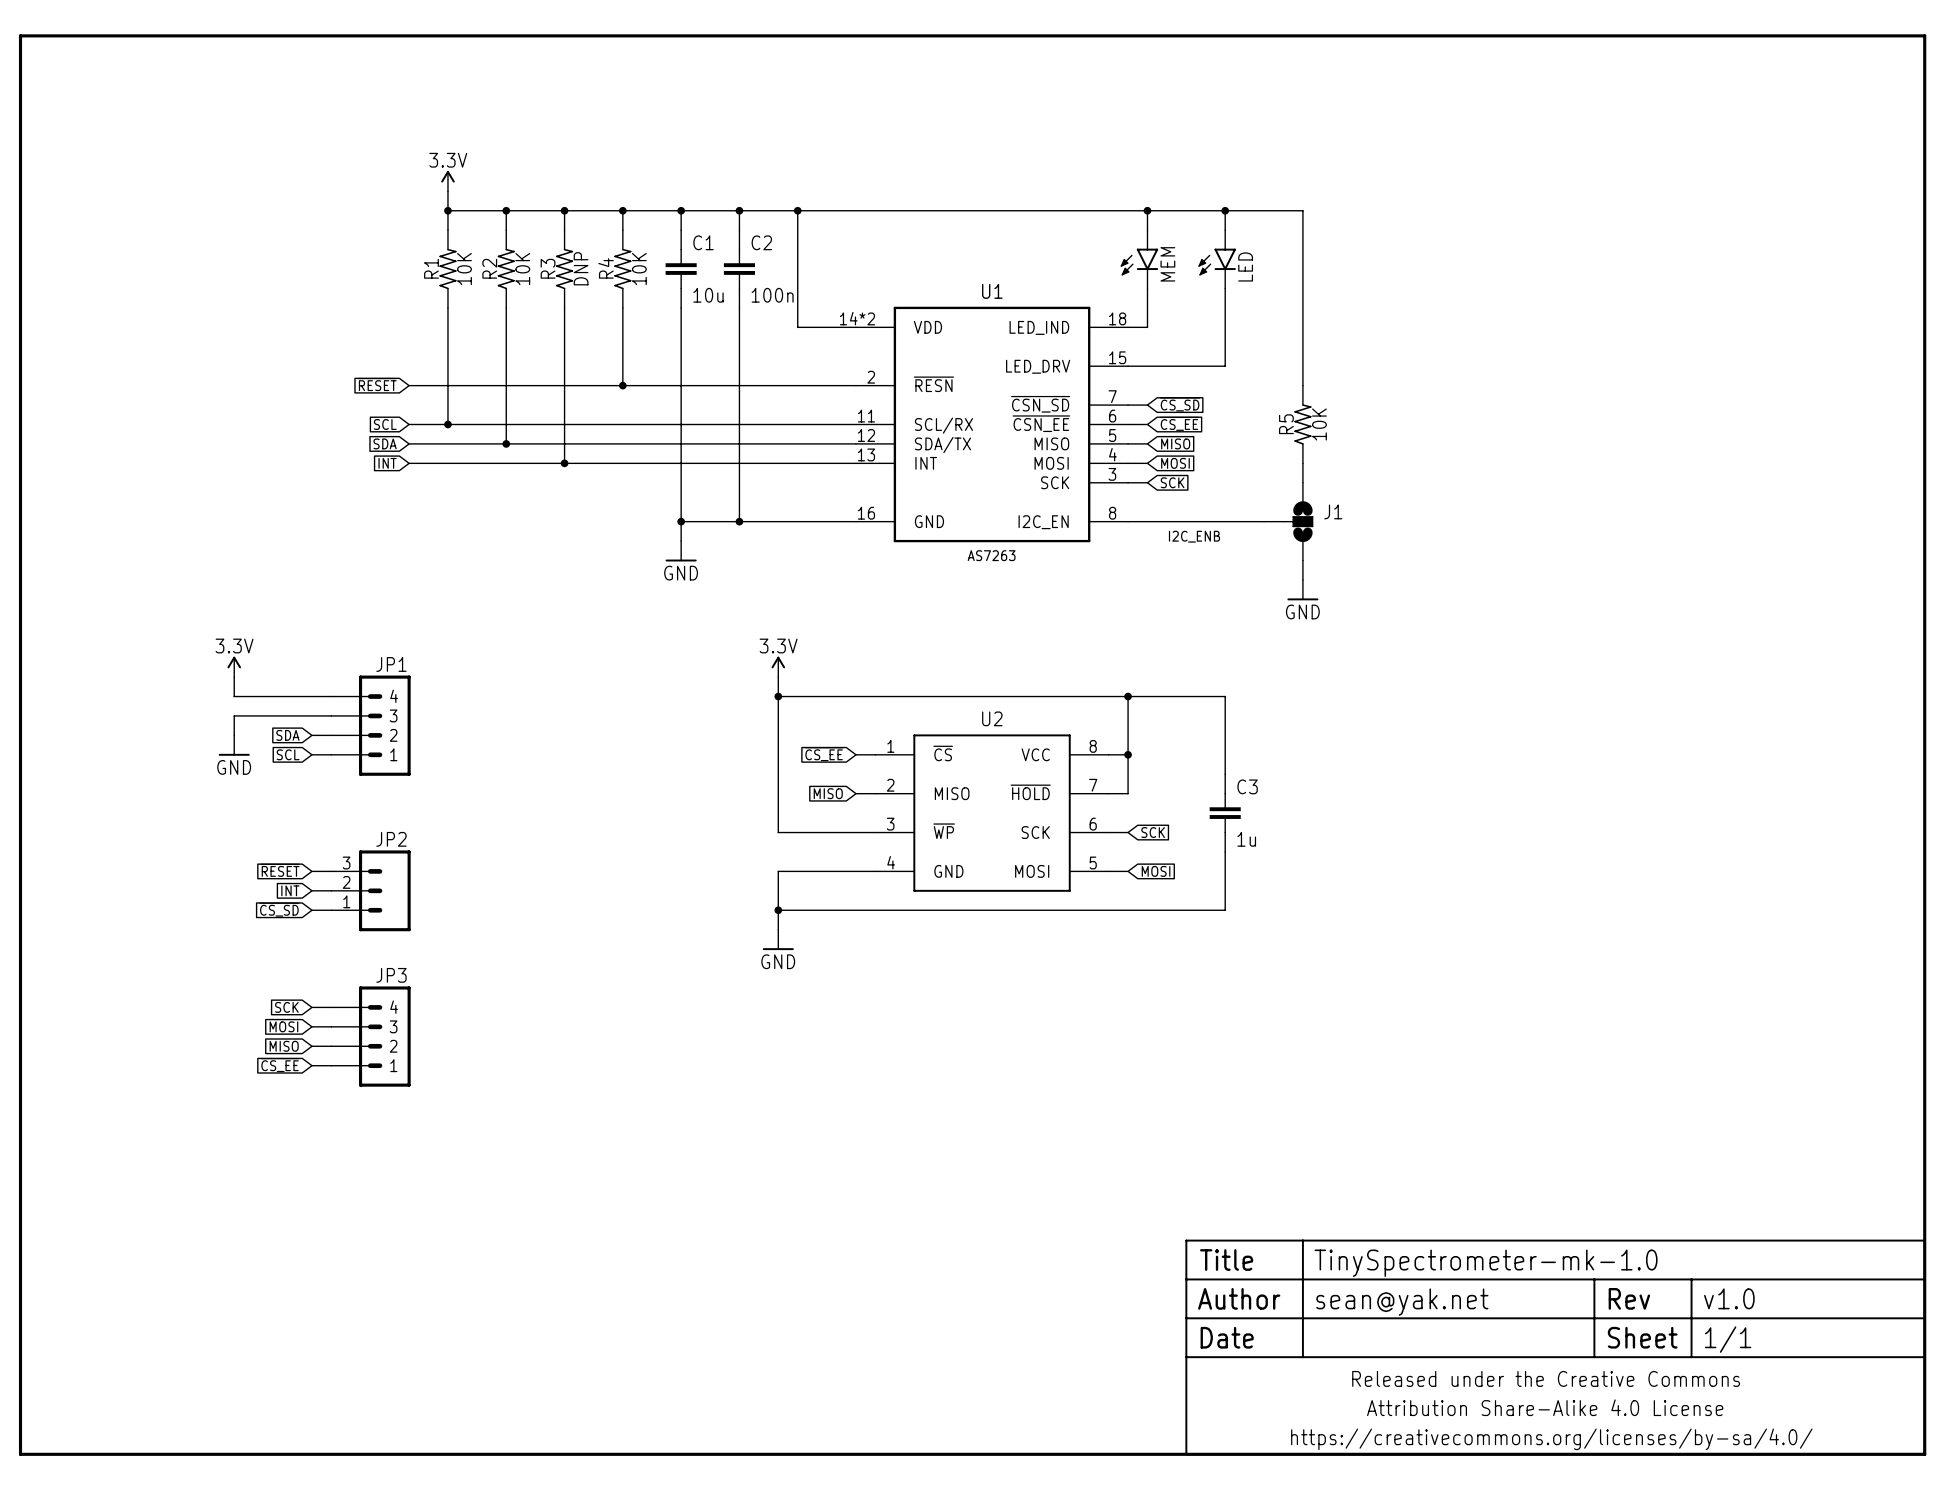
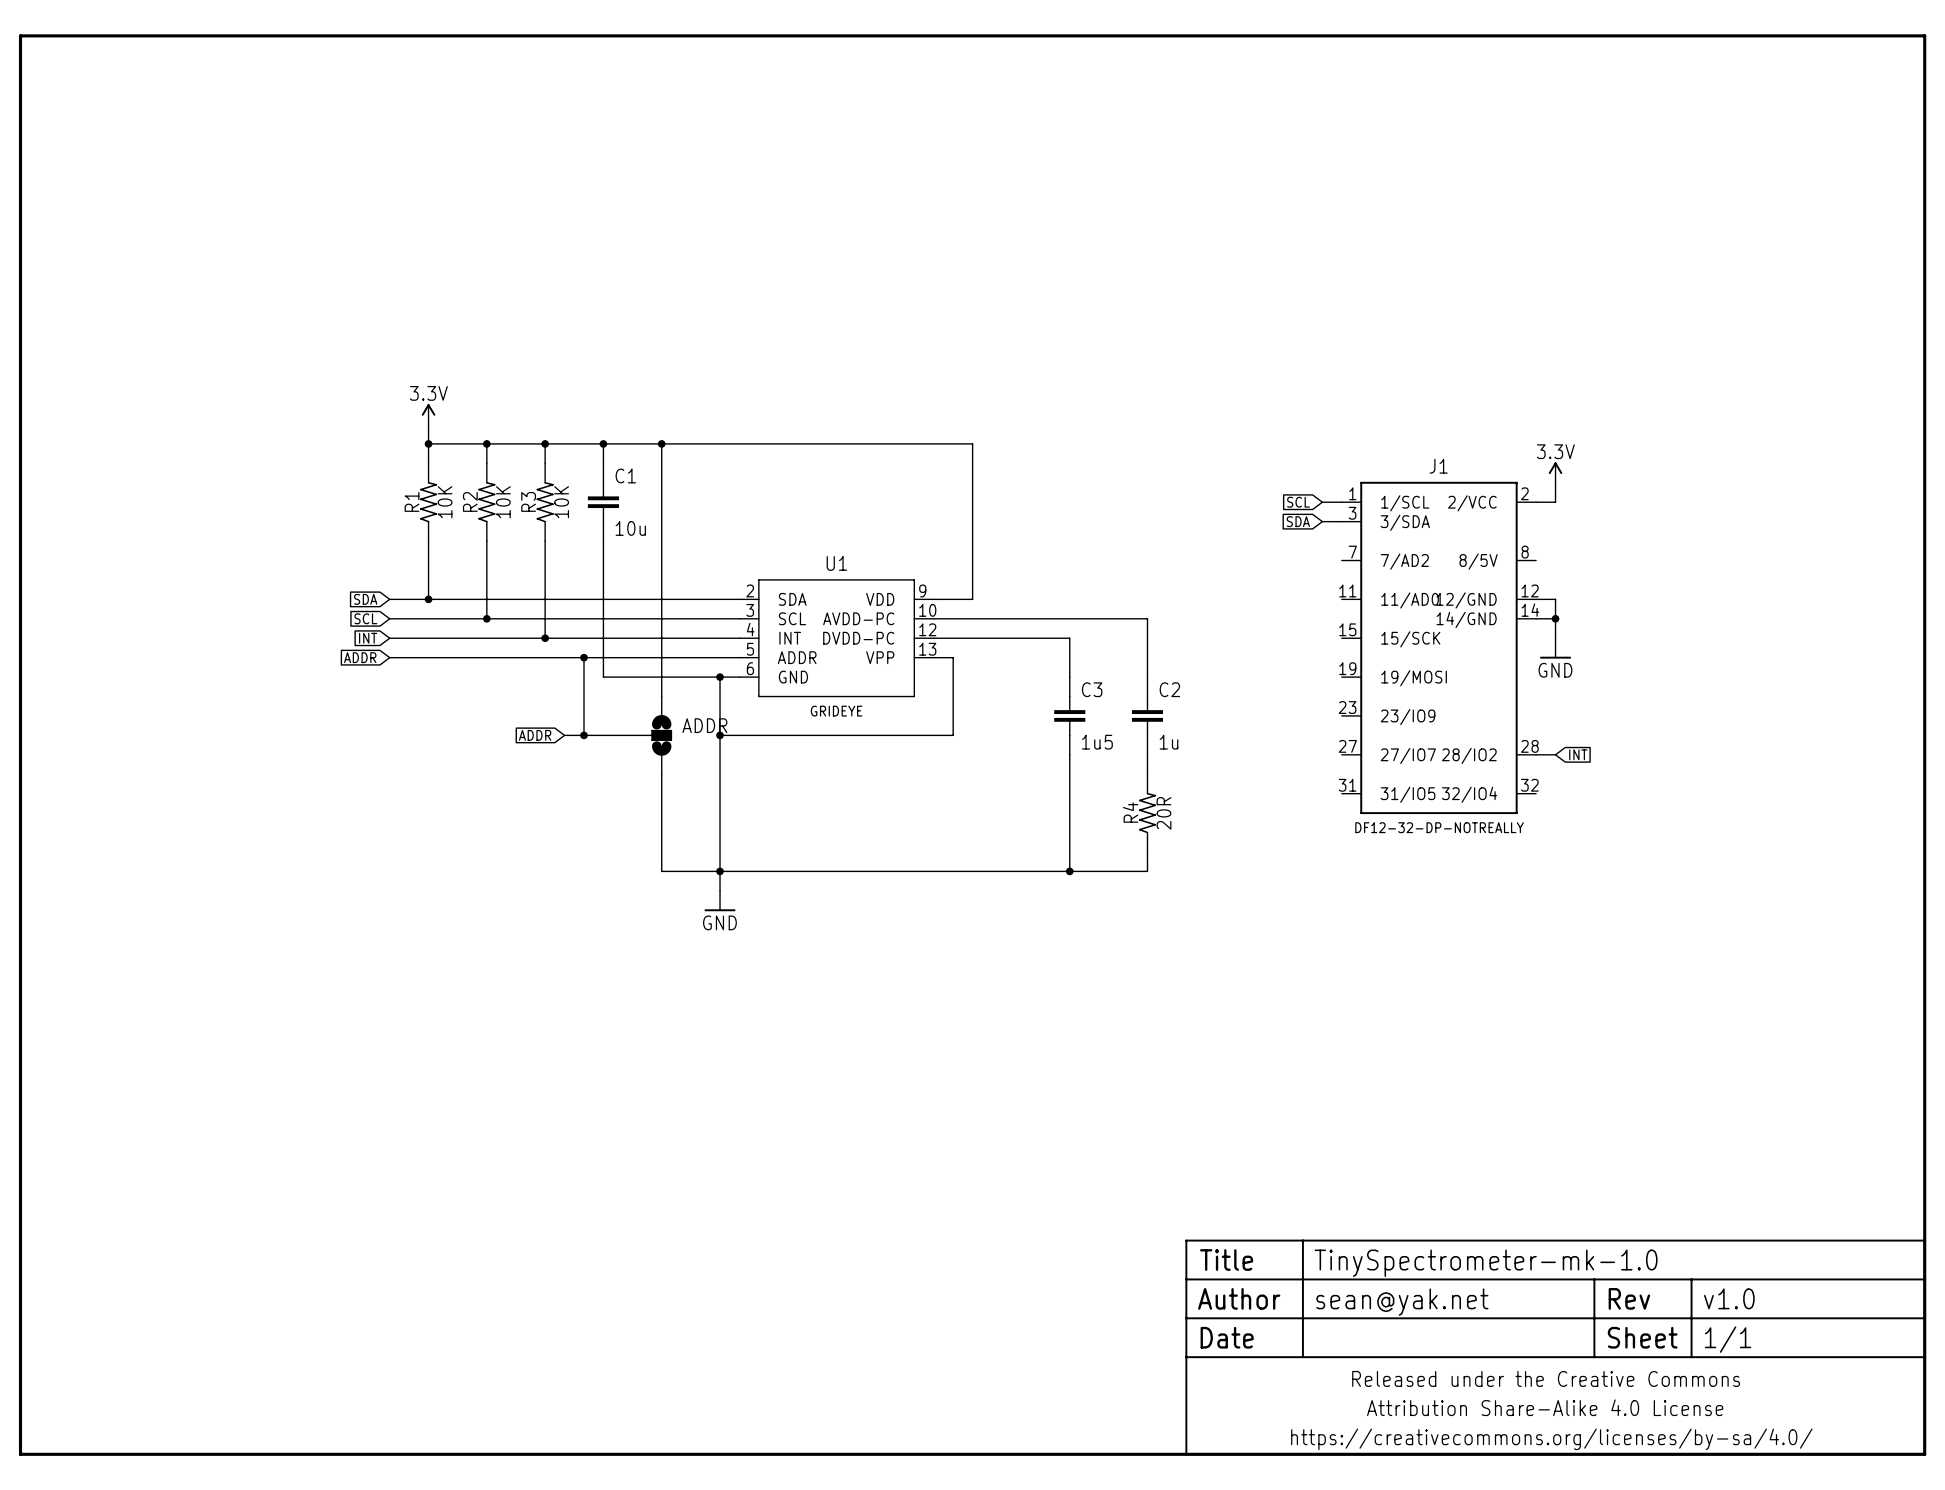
power symbol: 3.3V (447, 181) -> none
wire: (447, 191) (447, 230) -> none
wire: (447, 210) (1302, 210) (1302, 385) -> none
junction: (447, 210) -> none
wire: (506, 210) (506, 230) -> none
junction: (506, 210) -> none
wire: (564, 210) (564, 230) -> none
junction: (564, 210) -> none
wire: (622, 210) (622, 230) -> none
junction: (622, 210) -> none
wire: (681, 210) (681, 230) -> none
junction: (681, 210) -> none
wire: (739, 210) (739, 230) -> none
junction: (739, 210) -> none
wire: (797, 210) (797, 327) (856, 327) -> none
junction: (797, 210) -> none
wire: (1147, 210) (1147, 230) -> none
junction: (1147, 210) -> none
wire: (1225, 210) (1225, 230) -> none
junction: (1225, 210) -> none
MEM: (1139, 259) -> none
LED: (1217, 259) -> none
R3 value: DNP (581, 268) -> 10K (561, 502)
R1 position: (447, 269) -> (428, 502)
R2 position: (506, 269) -> (486, 502)
R3 position: (564, 269) -> (545, 502)
R4 position: (622, 269) -> (1147, 813)
R4 value: 10K (639, 269) -> 20R (1164, 813)
C1 position: (681, 269) -> (603, 502)
C2 position: (739, 269) -> (1147, 715)
wire: (1147, 288) (1147, 327) (1128, 327) -> none
wire: (1225, 288) (1225, 366) (1128, 366) -> none
U1 name position: U1 (992, 291) -> U1 (836, 563)
C2 value: 100n (772, 295) -> 1u (1168, 742)
U1 symbol: [856, 306, 1129, 543] -> [739, 579, 934, 698]
wire: (447, 307) (447, 424) -> none
wire: (506, 307) (506, 443) -> none
wire: (564, 307) (564, 463) -> none
wire: (622, 307) (622, 385) -> none
wire: (681, 307) (681, 541) -> none
wire: (739, 307) (739, 521) -> none
global label: ~{RESET} (377, 384) -> none
wire: (409, 385) (856, 385) -> none
junction: (622, 385) -> none
global label: ~{CS_SD} (1180, 404) -> none
wire: (1128, 405) (1147, 405) -> none
power symbol: none -> 3.3V (428, 414)
global label: ~{CS_EE} (1179, 423) -> none
global label: SCL (385, 424) -> none
wire: (409, 424) (856, 424) -> none
wire: none -> (428, 424) (428, 463)
junction: (447, 424) -> none
wire: (1128, 424) (1147, 424) -> none
R5: 10K (1302, 424) -> none
global label: SDA (385, 443) -> none
wire: (409, 443) (428, 443) -> none
junction: none -> (428, 443)
wire: none -> (486, 443) (486, 463)
junction: none -> (486, 443)
junction: (506, 443) -> none
wire: none -> (545, 443) (545, 463)
junction: none -> (545, 443)
wire: none -> (603, 443) (603, 463)
junction: none -> (603, 443)
wire: none -> (661, 443) (661, 696)
junction: none -> (661, 443)
wire: none -> (856, 443) (972, 443) (972, 599) (933, 599)
wire: (1128, 443) (1147, 443) -> none
global label: MISO (1175, 443) -> none
global label: INT (387, 463) -> none
wire: (409, 463) (856, 463) -> none
junction: (564, 463) -> none
wire: (1128, 463) (1147, 463) -> none
global label: MOSI (1175, 463) -> none
wire: (1302, 463) (1302, 482) -> none
power symbol: none -> 3.3V (1555, 472)
wire: (1128, 482) (1147, 482) -> none
global label: SCK (1172, 482) -> none
J1 symbol: [1264, 482, 1314, 561] -> [1341, 481, 1537, 815]
wire: none -> (1555, 482) (1555, 502) (1536, 502)
global label: none -> SCL (1298, 502)
wire: none -> (1322, 502) (1341, 502)
J1 name position: J1 (1333, 511) -> J1 (1438, 466)
wire: (681, 521) (856, 521) -> none
junction: (681, 521) -> none
junction: (739, 521) -> none
wire: (1128, 521) (1264, 521) -> none
global label: none -> SDA (1298, 521)
wire: none -> (1322, 521) (1341, 521)
label: I2C_ENB (1194, 536) -> none
wire: none -> (428, 541) (428, 599)
wire: none -> (486, 541) (486, 618)
wire: none -> (545, 541) (545, 638)
wire: none -> (603, 541) (603, 677) (739, 677)
power symbol: GND (681, 551) -> none
U1 value: AS7263 (991, 555) -> GRIDEYE (836, 711)
wire: (1302, 560) (1302, 579) -> none
power symbol: GND (1302, 590) -> none
global label: none -> SDA (365, 599)
wire: none -> (389, 599) (739, 599)
junction: none -> (428, 599)
wire: none -> (1536, 599) (1555, 599) (1555, 638)
global label: none -> SCL (365, 618)
wire: none -> (389, 618) (739, 618)
junction: none -> (486, 618)
wire: none -> (933, 618) (1147, 618) (1147, 677)
wire: none -> (1536, 618) (1555, 618)
junction: none -> (1555, 618)
global label: none -> INT (368, 638)
wire: none -> (389, 638) (739, 638)
junction: none -> (545, 638)
wire: none -> (933, 638) (1069, 638) (1069, 677)
power symbol: none -> GND (1555, 648)
global label: none -> ADDR (360, 657)
wire: none -> (389, 657) (739, 657)
wire: none -> (583, 657) (583, 735)
junction: none -> (583, 657)
wire: none -> (933, 657) (953, 657) (953, 735) (720, 735)
power symbol: 3.3V (234, 666) -> none
power symbol: 3.3V (778, 666) -> none
wire: (234, 677) (234, 696) (331, 696) -> none
wire: none -> (720, 677) (720, 890)
junction: none -> (720, 677)
wire: (778, 677) (778, 832) (875, 832) -> none
wire: (778, 696) (1225, 696) (1225, 774) -> none
junction: (778, 696) -> none
wire: (1128, 696) (1128, 793) (1108, 793) -> none
junction: (1128, 696) -> none
wire: (331, 715) (234, 715) (234, 735) -> none
JP1: (371, 725) -> none
global label: SDA (287, 735) -> none
wire: (311, 735) (331, 735) -> none
global label: none -> ADDR (535, 735)
wire: none -> (564, 735) (622, 735)
junction: none -> (583, 735)
ADDR: none -> (647, 735)
junction: none -> (720, 735)
power symbol: GND (234, 745) -> none
global label: SCL (288, 754) -> none
wire: (311, 754) (331, 754) -> none
global label: ~{CS_EE} (824, 754) -> none
wire: (856, 754) (875, 754) -> none
wire: (1108, 754) (1128, 754) -> none
junction: (1128, 754) -> none
wire: none -> (1147, 754) (1147, 774)
wire: none -> (1536, 754) (1555, 754)
global label: none -> INT (1578, 754)
global label: MISO (828, 793) -> none
wire: (856, 793) (875, 793) -> none
U2: (992, 813) -> none
C3 position: (1225, 813) -> (1069, 715)
J1 value: none -> DF12-32-DP-NOTREALLY (1439, 827)
wire: (1108, 832) (1128, 832) -> none
global label: SCK (1153, 832) -> none
C3 value: 1u (1246, 839) -> 1u5 (1097, 742)
wire: none -> (1147, 851) (1147, 871) (1128, 871)
wire: (1225, 851) (1225, 910) (778, 910) -> none
global label: ~{RESET} (280, 870) -> none
wire: (311, 871) (331, 871) -> none
junction: none -> (720, 871)
wire: (778, 871) (778, 929) -> (778, 871) (661, 871) (661, 774)
wire: none -> (875, 871) (1108, 871)
junction: none -> (1069, 871)
global label: MOSI (1156, 871) -> none
global label: INT (290, 890) -> none
wire: (311, 890) (331, 890) -> none
JP2: (371, 890) -> none
global label: ~{CS_SD} (279, 909) -> none
wire: (311, 910) (331, 910) -> none
junction: (778, 910) -> none
power symbol position: GND (778, 939) -> GND (720, 901)
global label: SCK (286, 1007) -> none
wire: (311, 1007) (331, 1007) -> none
global label: MOSI (283, 1026) -> none
wire: (311, 1026) (331, 1026) -> none
JP3: (371, 1036) -> none
global label: MISO (284, 1046) -> none
wire: (311, 1046) (331, 1046) -> none
global label: ~{CS_EE} (280, 1065) -> none
wire: (311, 1065) (331, 1065) -> none

